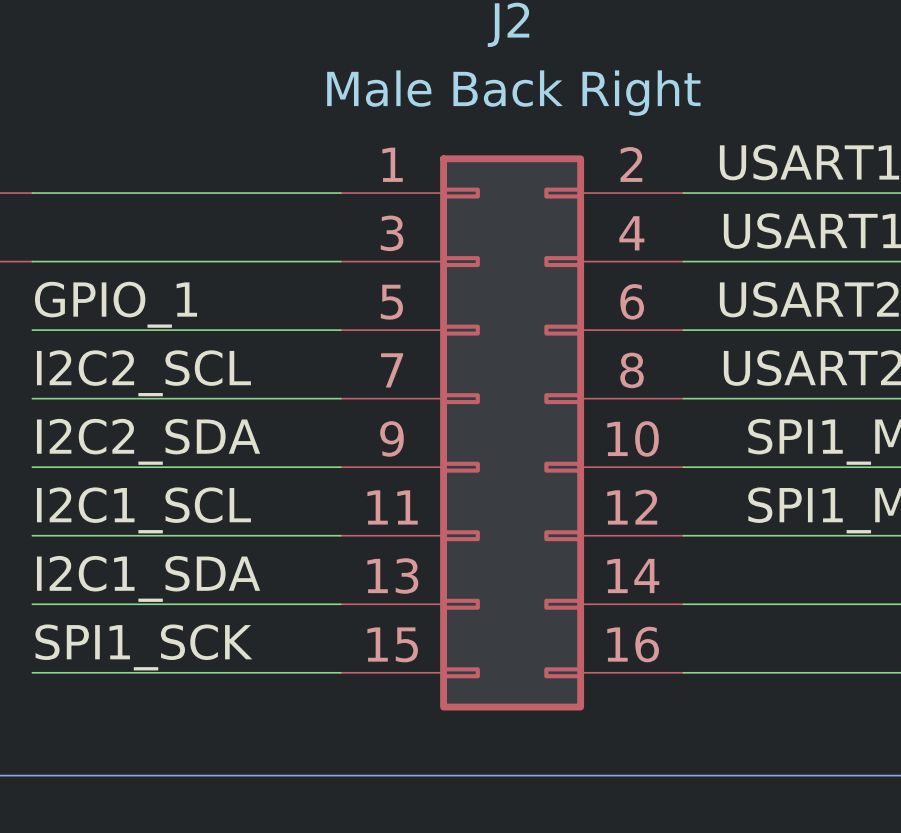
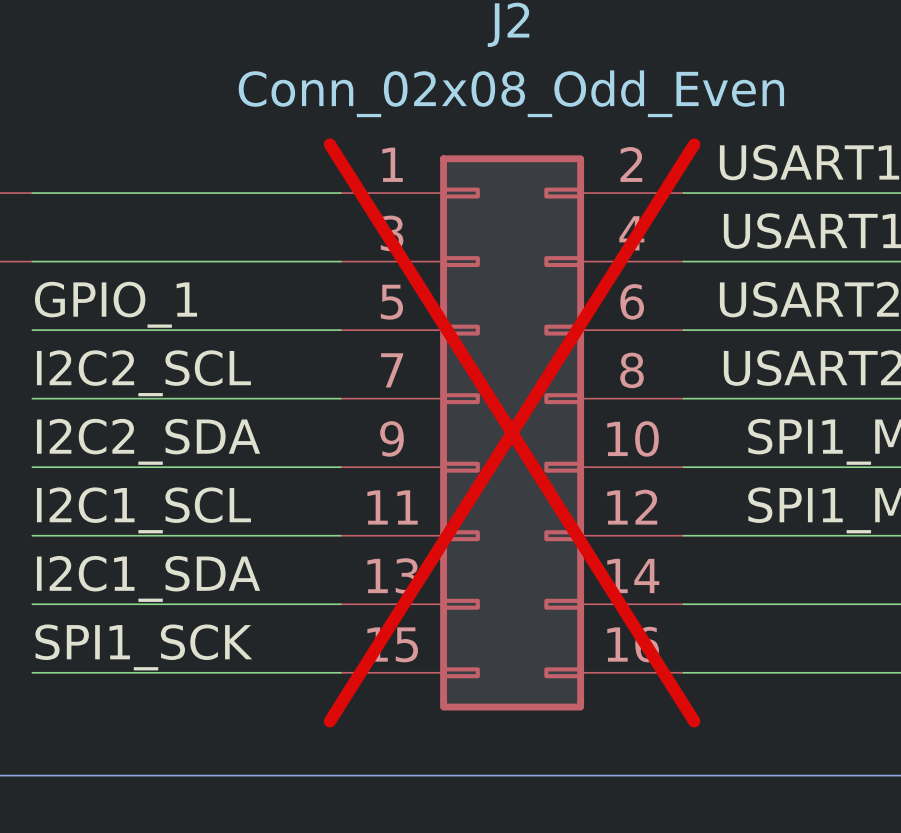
J2 value: Male Back Right (513, 93) -> Conn_02x08_Odd_Even (511, 93)
J2 do-not-place cross: none -> (512, 432)

